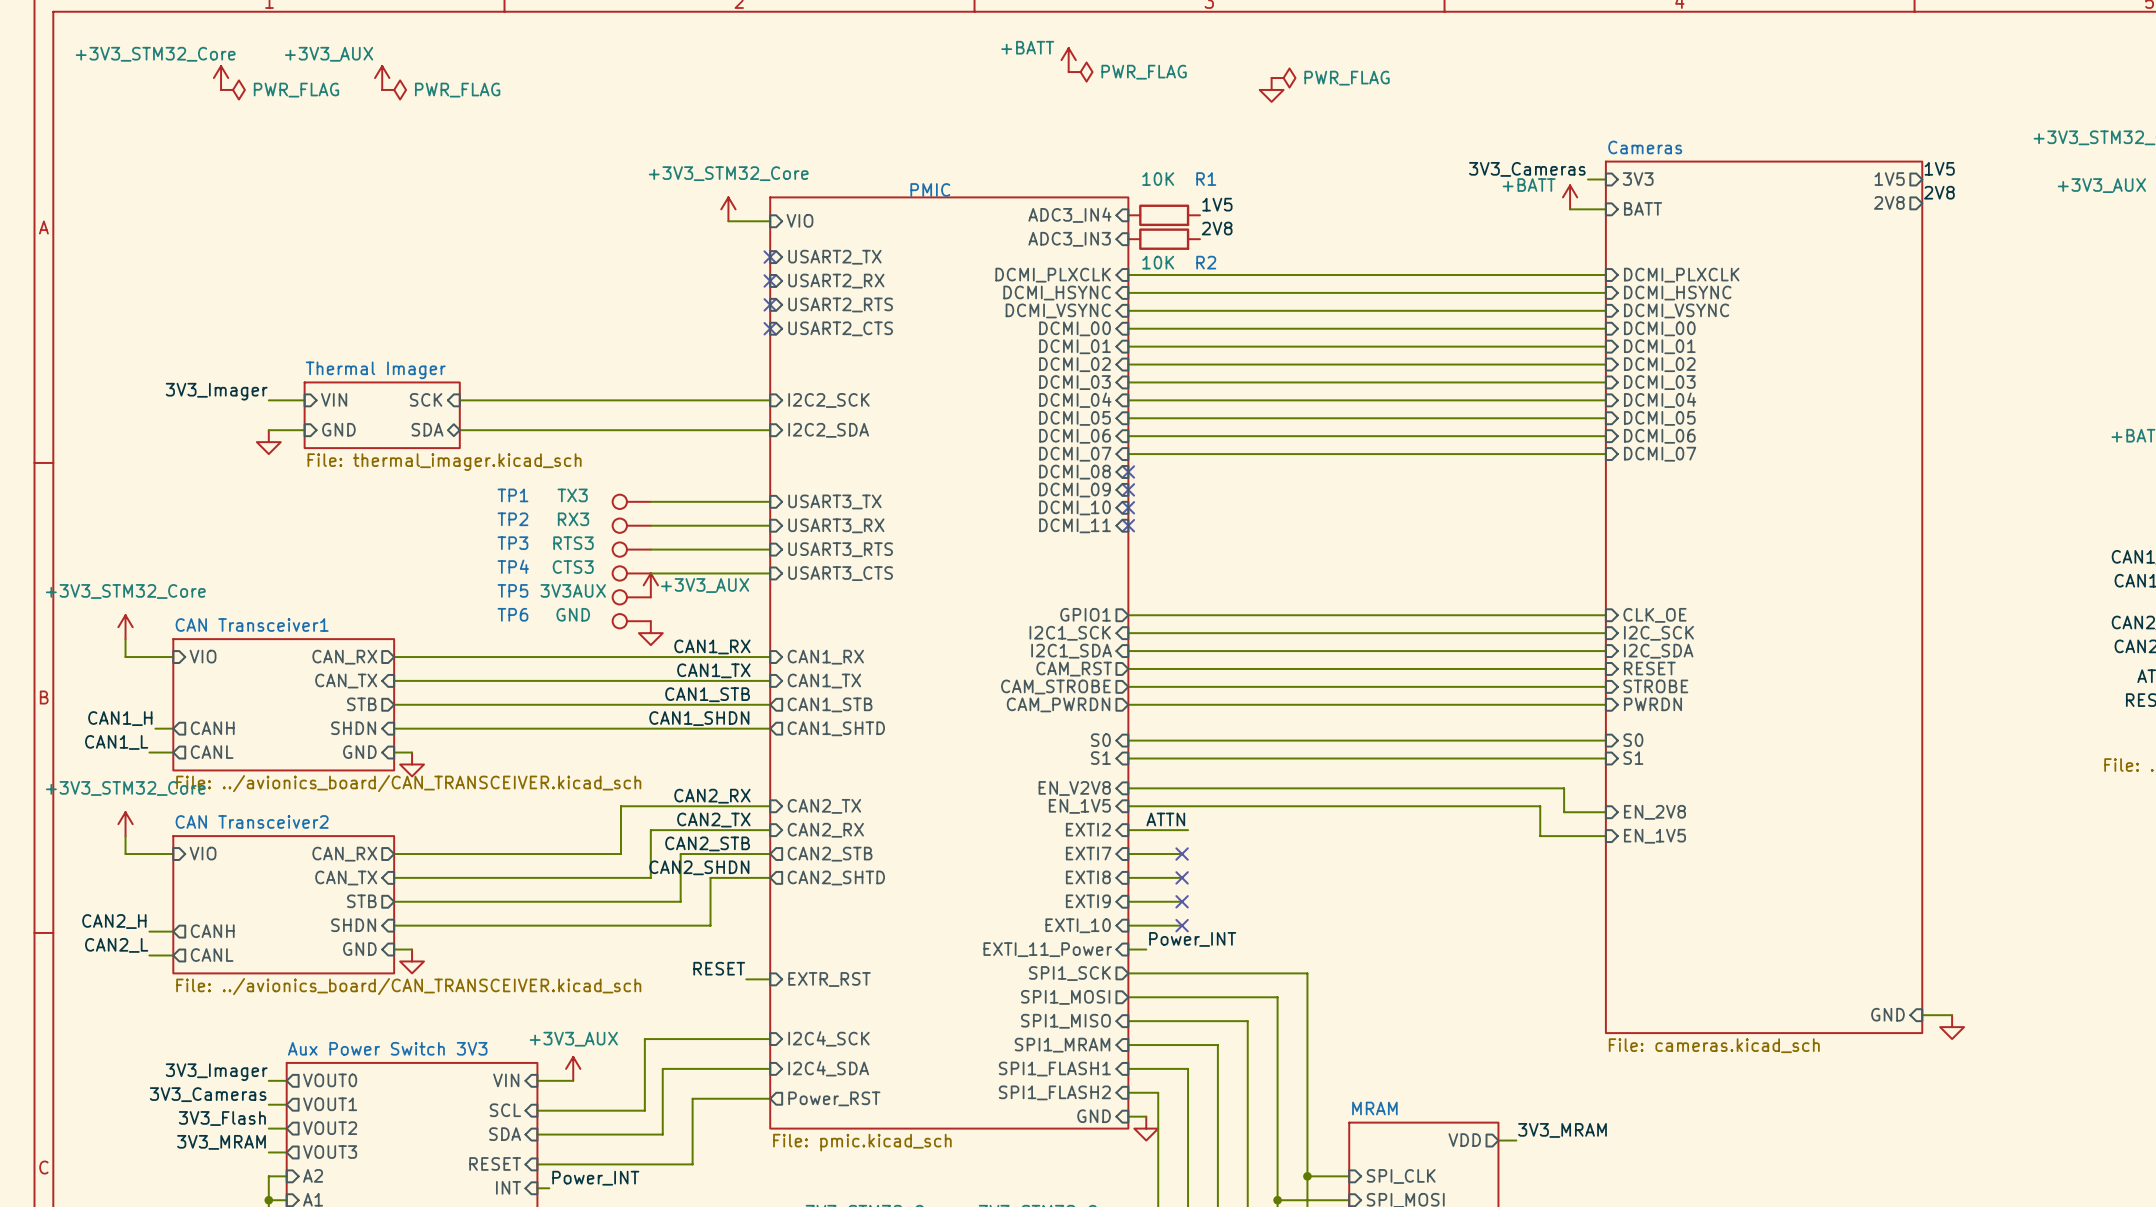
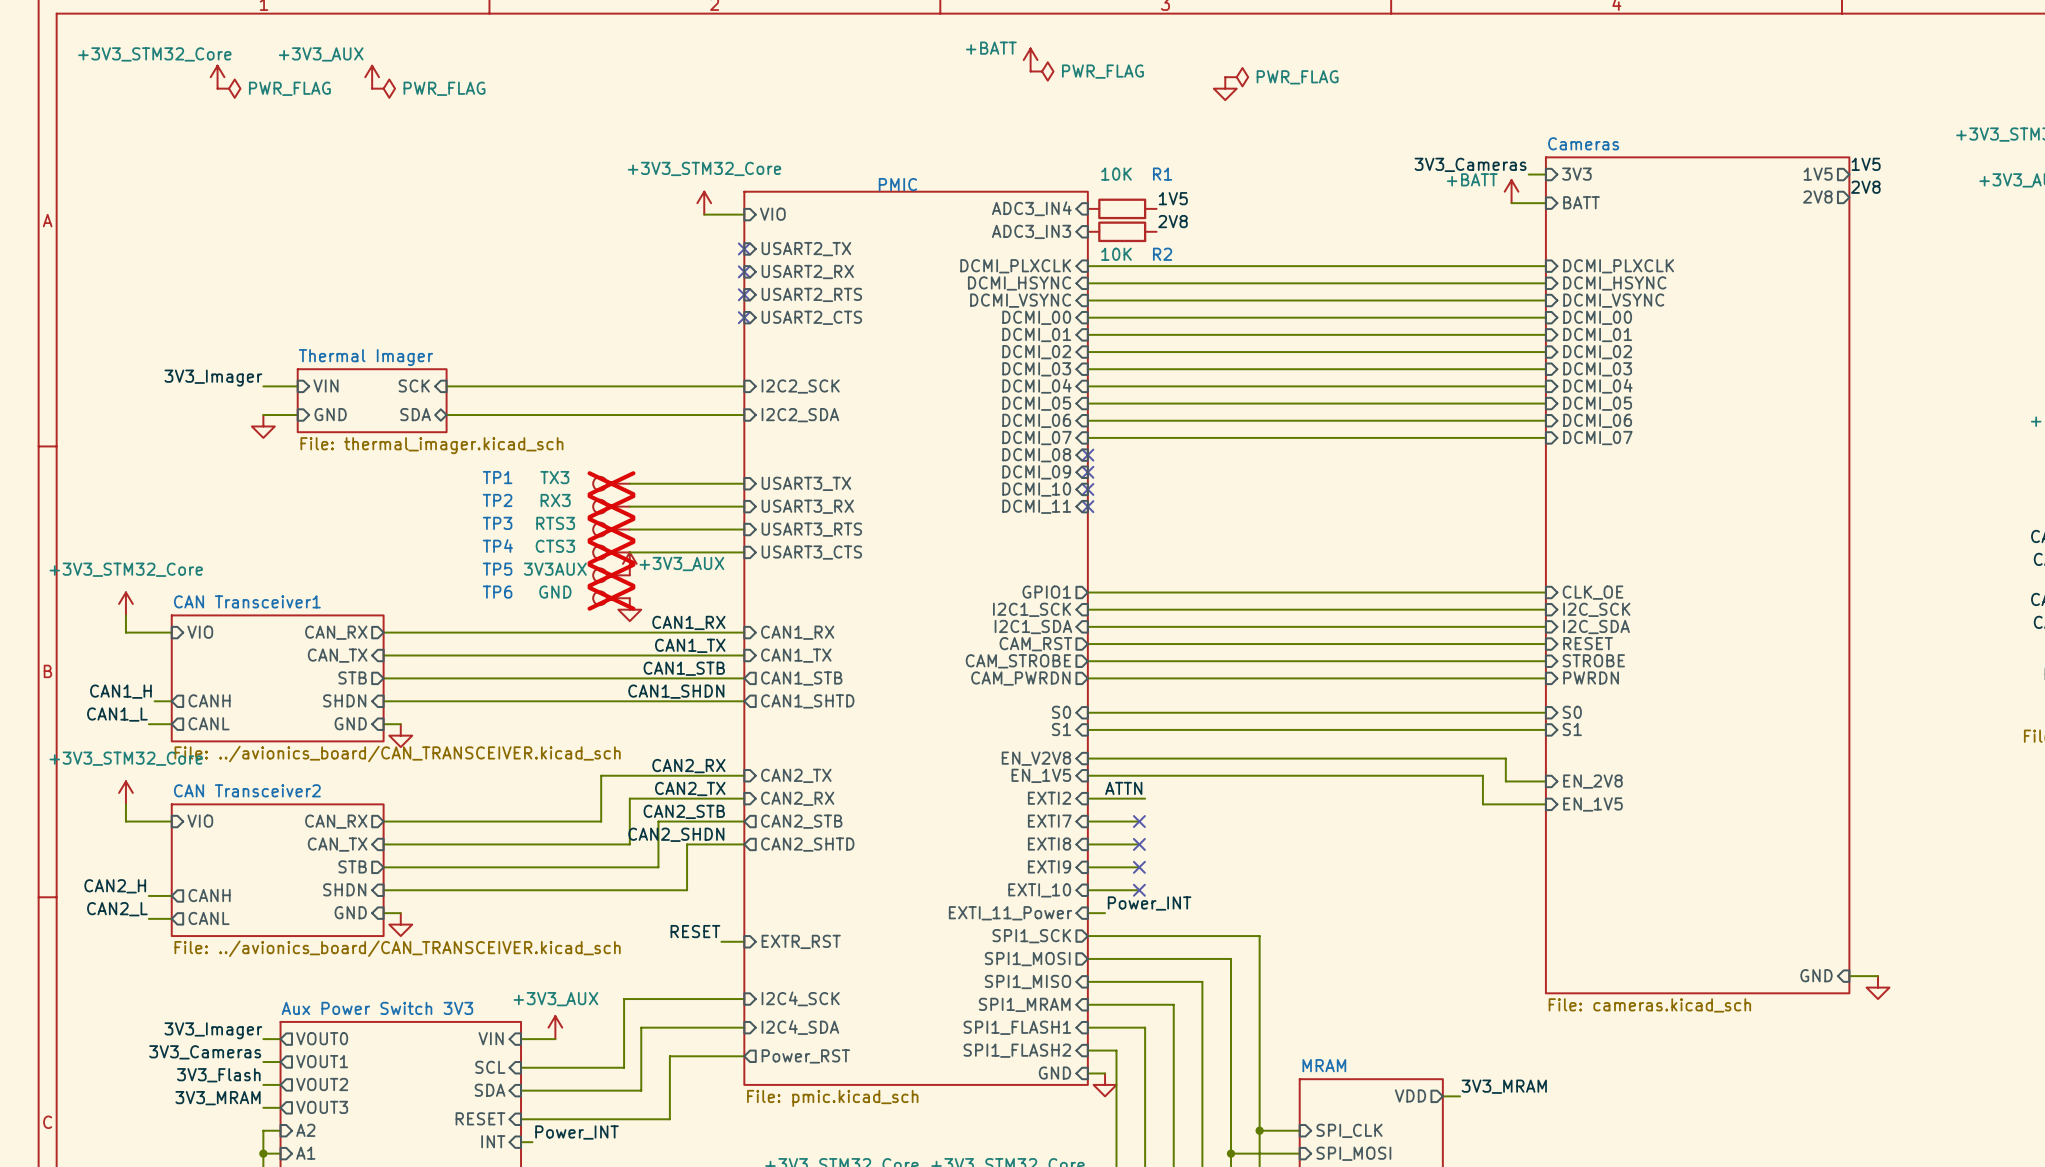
TP1 do-not-place cross: none -> (611, 483)
TP2 do-not-place cross: none -> (611, 506)
TP3 do-not-place cross: none -> (611, 529)
TP4 do-not-place cross: none -> (611, 552)
TP5 do-not-place cross: none -> (611, 575)
TP6 do-not-place cross: none -> (611, 598)

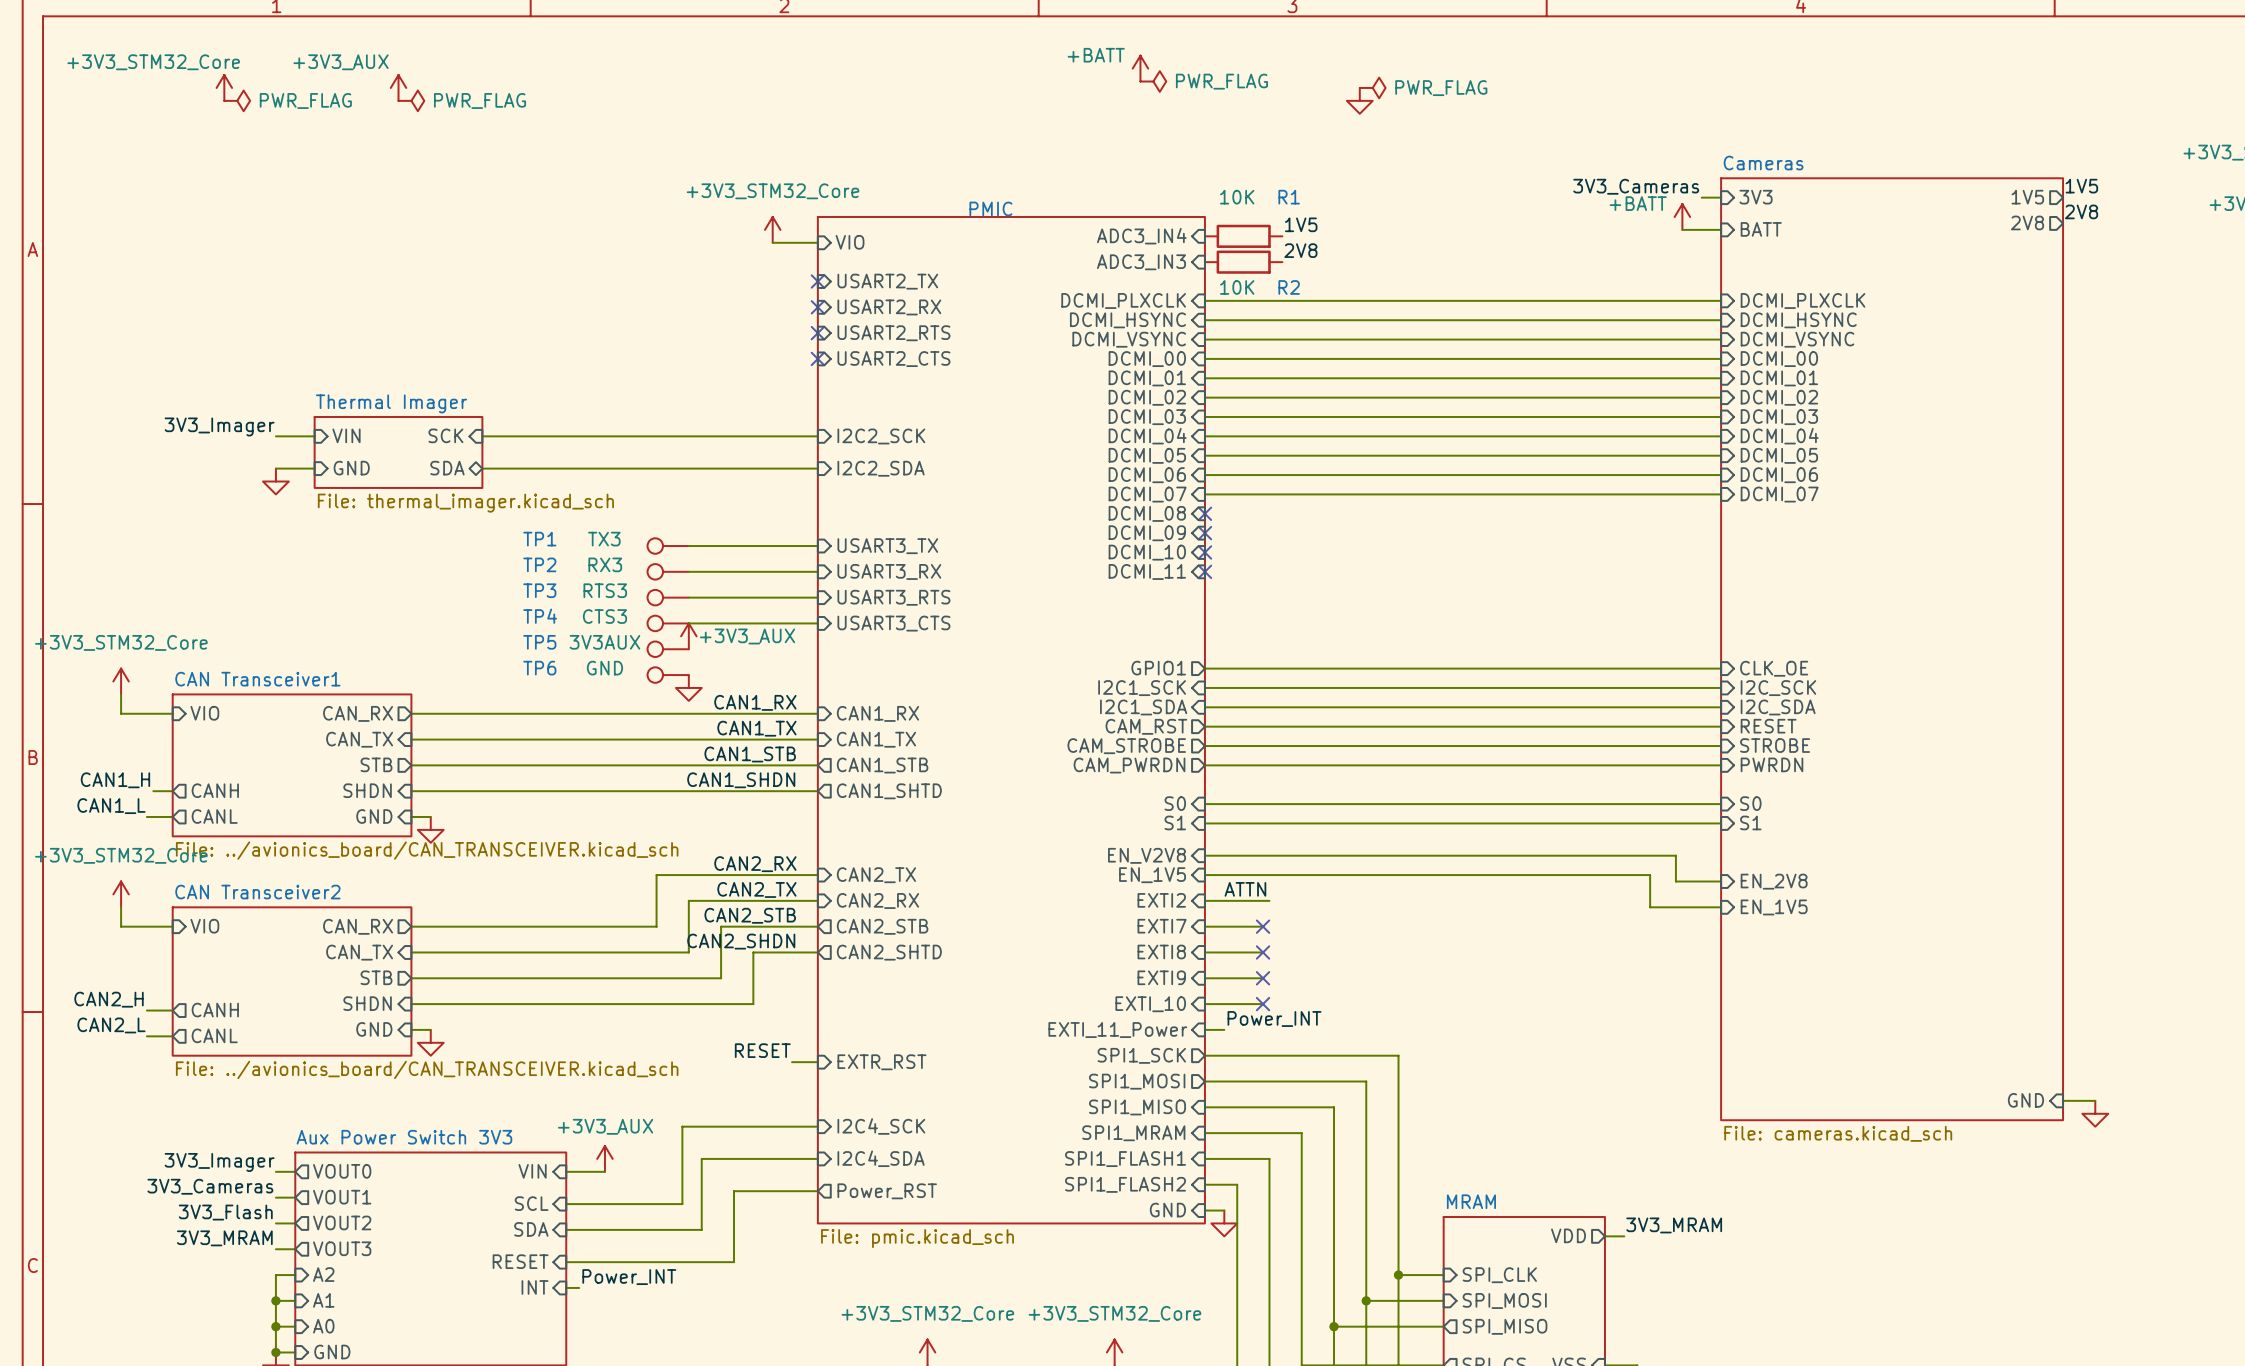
TP1 do-not-place cross: (611, 483) -> none
TP2 do-not-place cross: (611, 506) -> none
TP3 do-not-place cross: (611, 529) -> none
TP4 do-not-place cross: (611, 552) -> none
TP5 do-not-place cross: (611, 575) -> none
TP6 do-not-place cross: (611, 598) -> none

